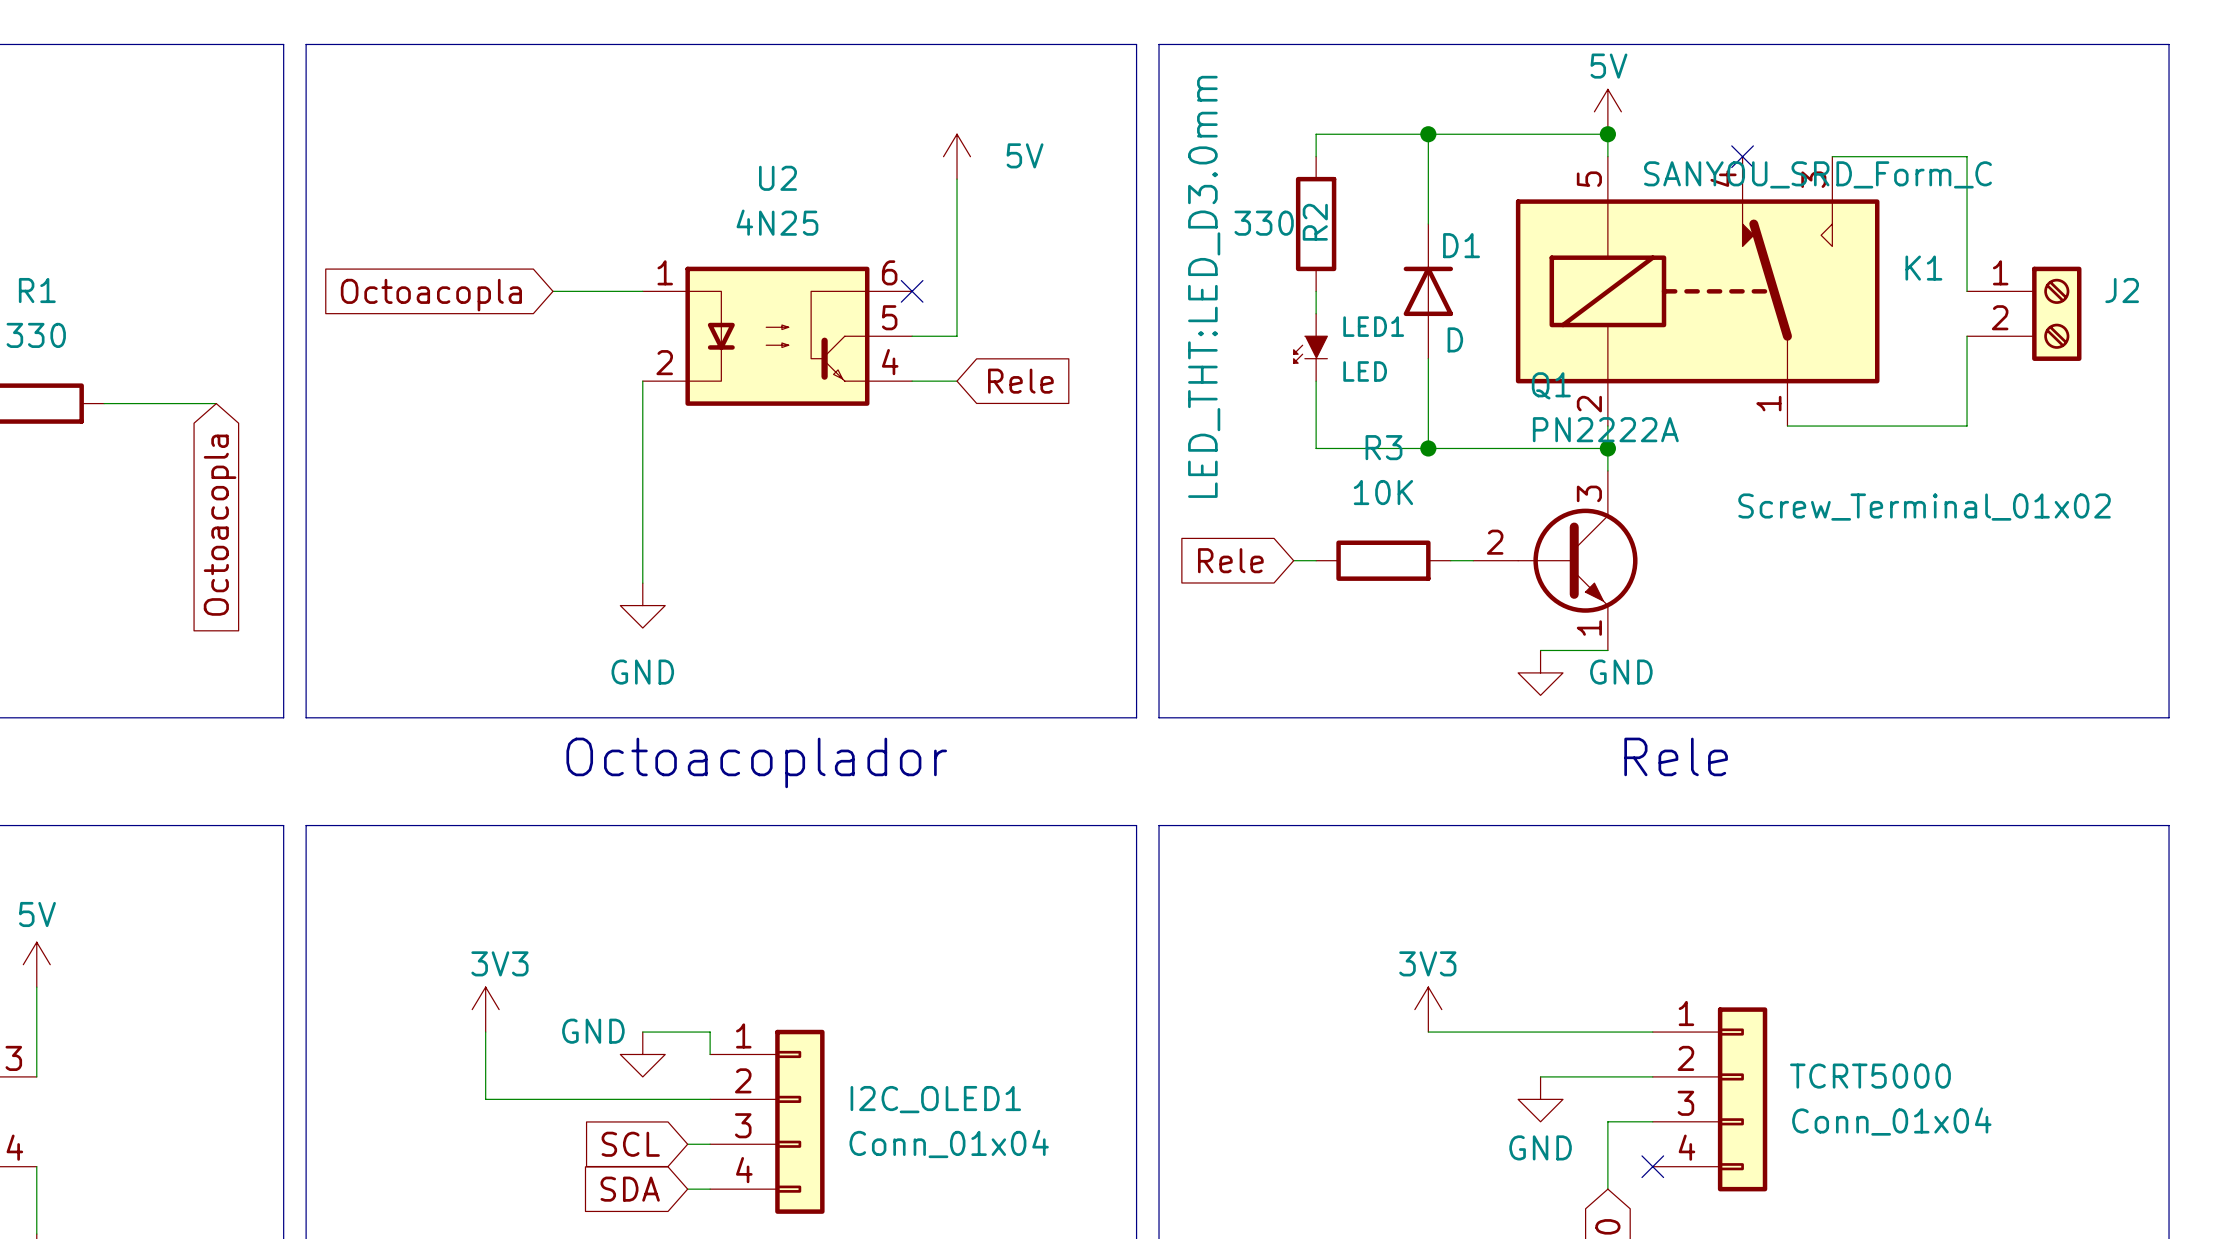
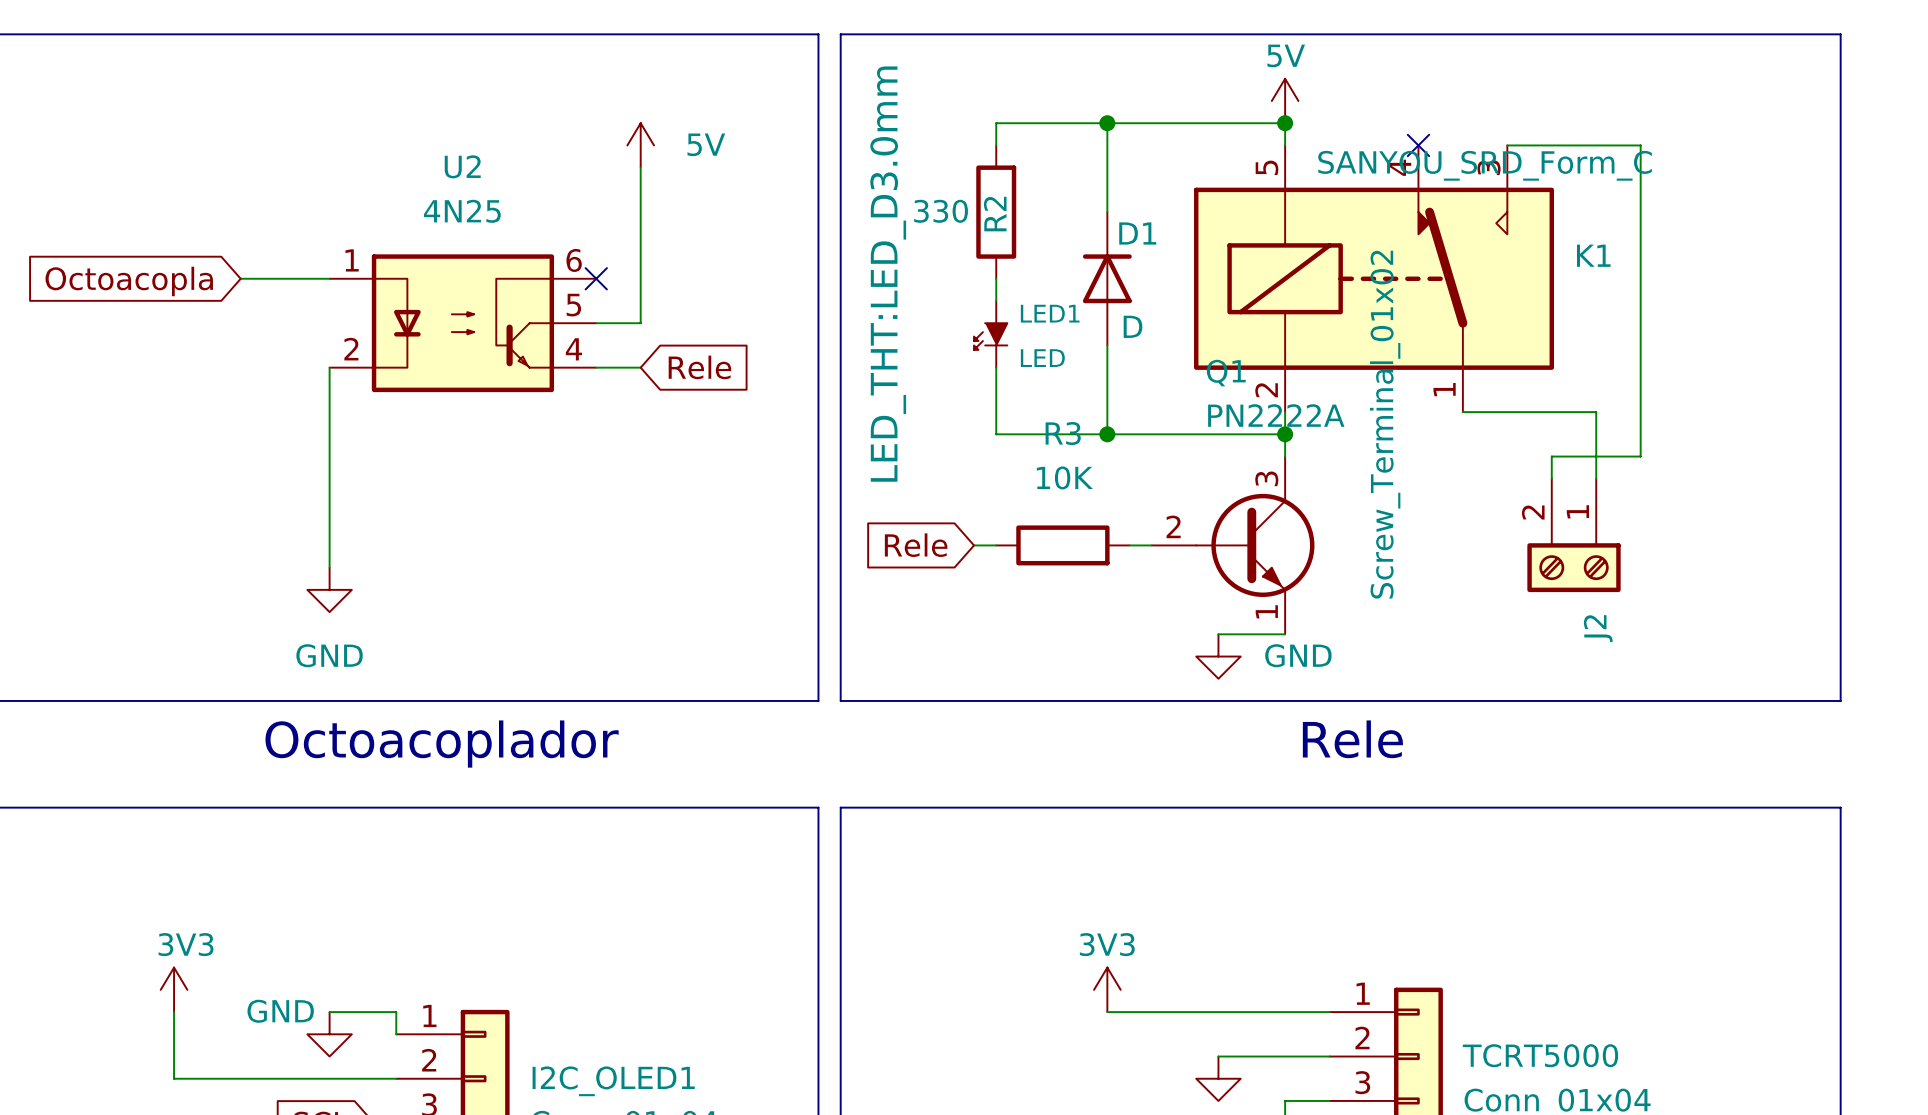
wire: none -> (1640, 278) (1640, 323)
J2 position: (2024, 313) -> (1574, 535)
J2 rotation: 0° (2056, 313) -> 90° clockwise (1574, 567)
wire: (1922, 426) (1967, 426) -> (1596, 412) (1596, 478)
wire: none -> (1640, 412) (1640, 456) (1551, 456) (1551, 478)

